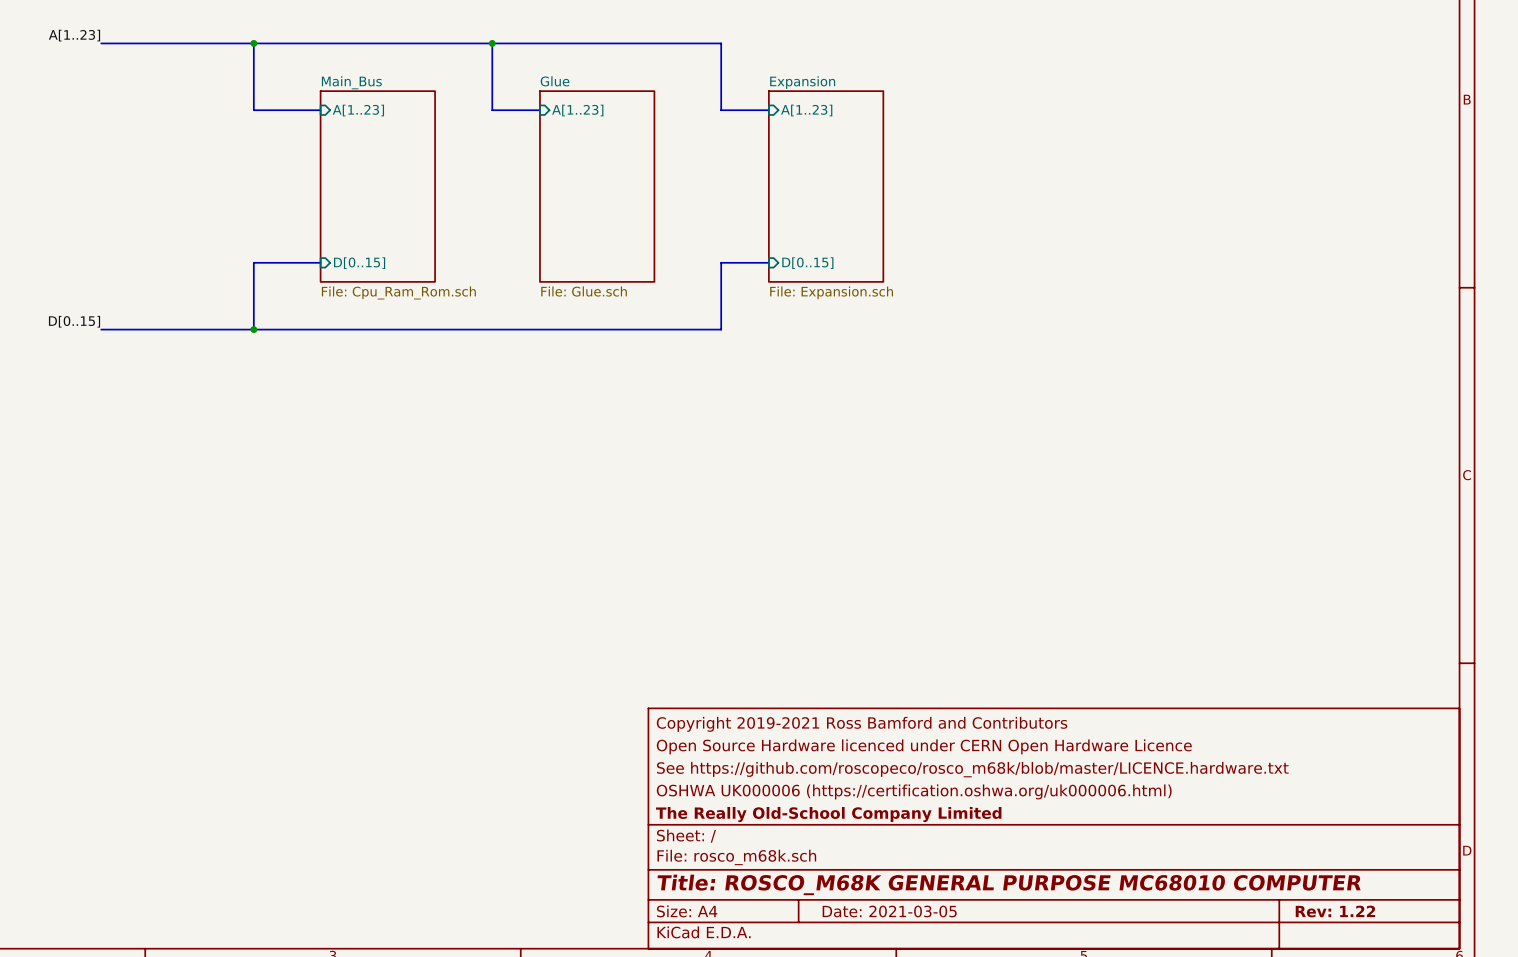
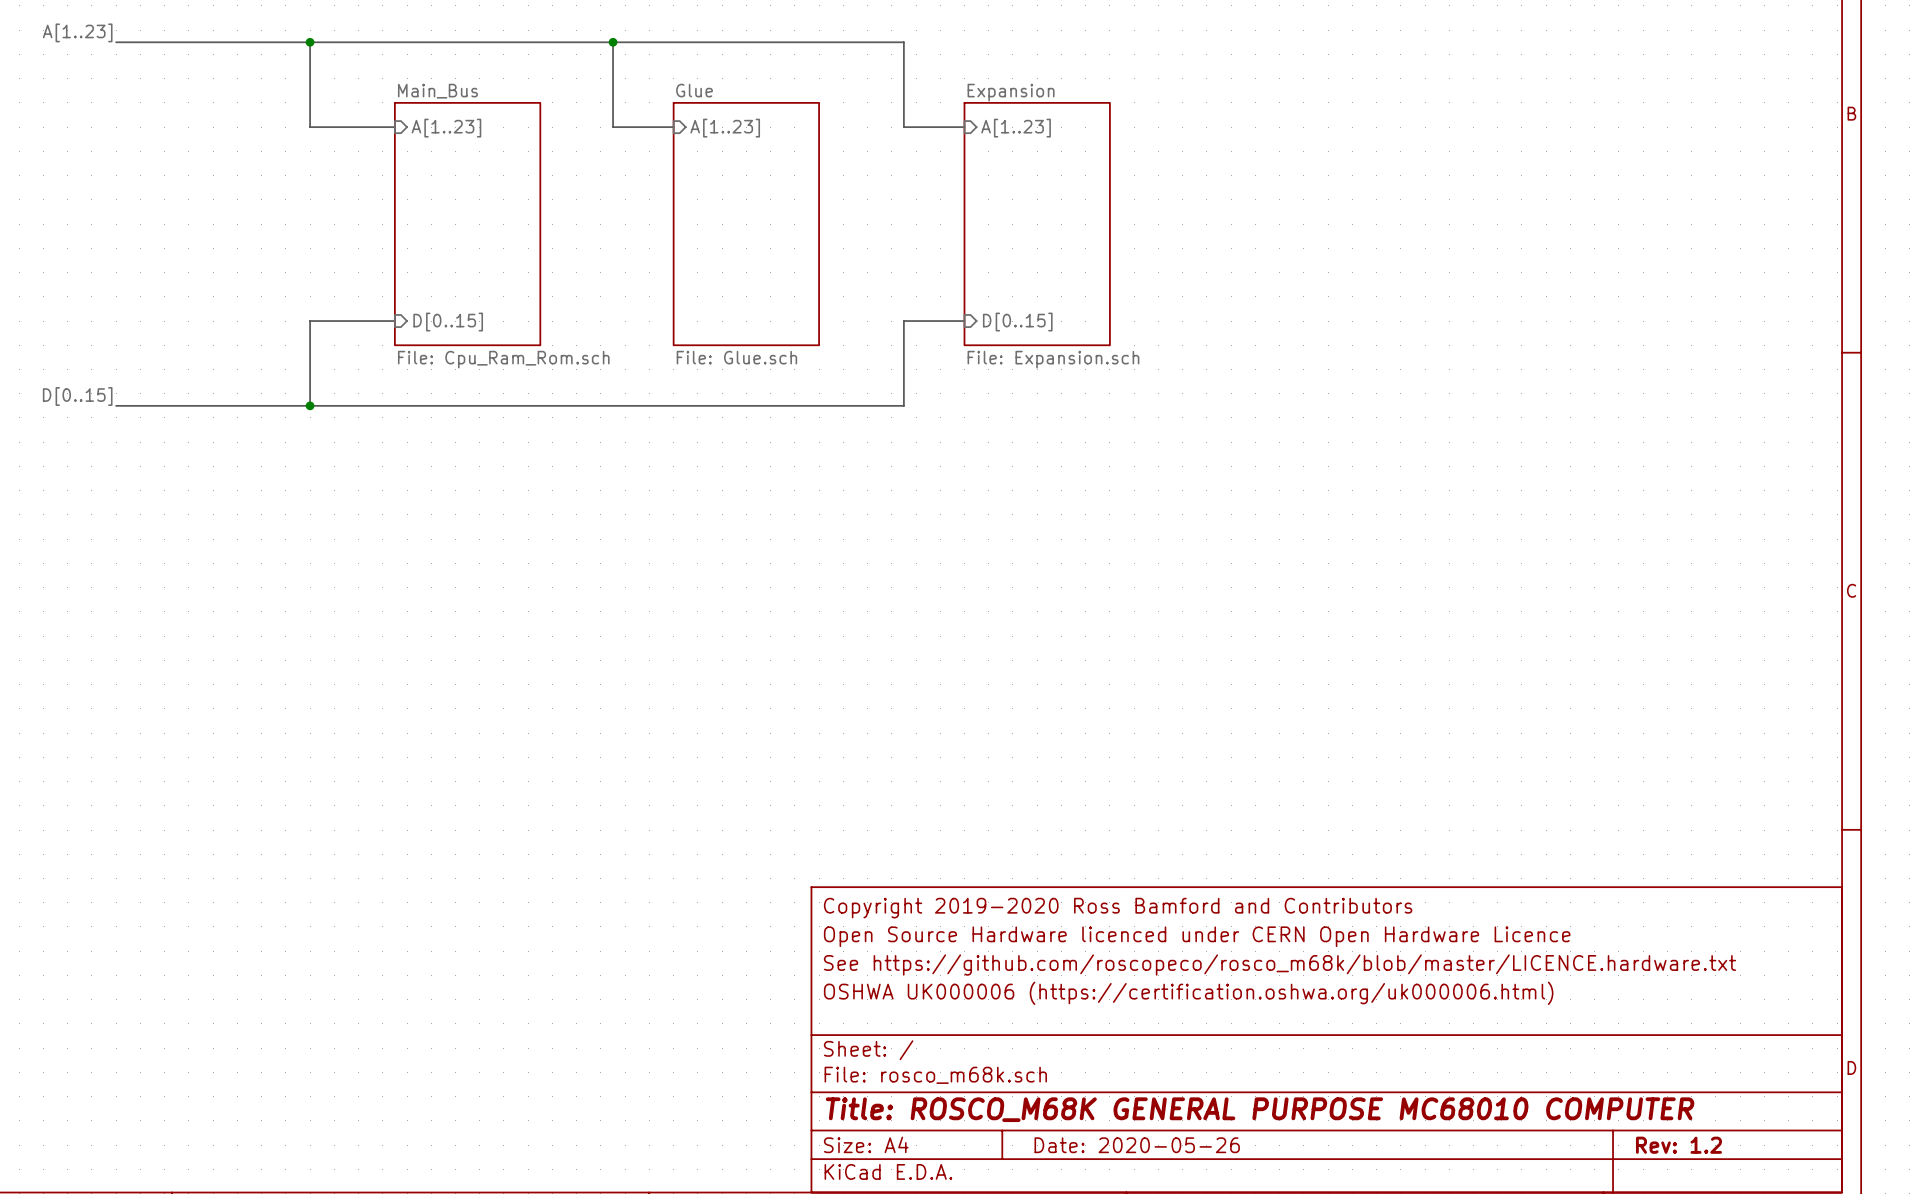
title block: Copyright 2019-2021 Ross Bamford and Contributors (862, 724) -> Copyright 2019-2020 Ross Bamford and Contributors (1118, 908)
title block: The Really Old-School Company Limited (828, 814) -> none
title block: Date: 2021-03-05 (889, 911) -> Date: 2020-05-26 (1137, 1145)
title block: Rev: 1.22 (1335, 911) -> Rev: 1.2 (1678, 1145)

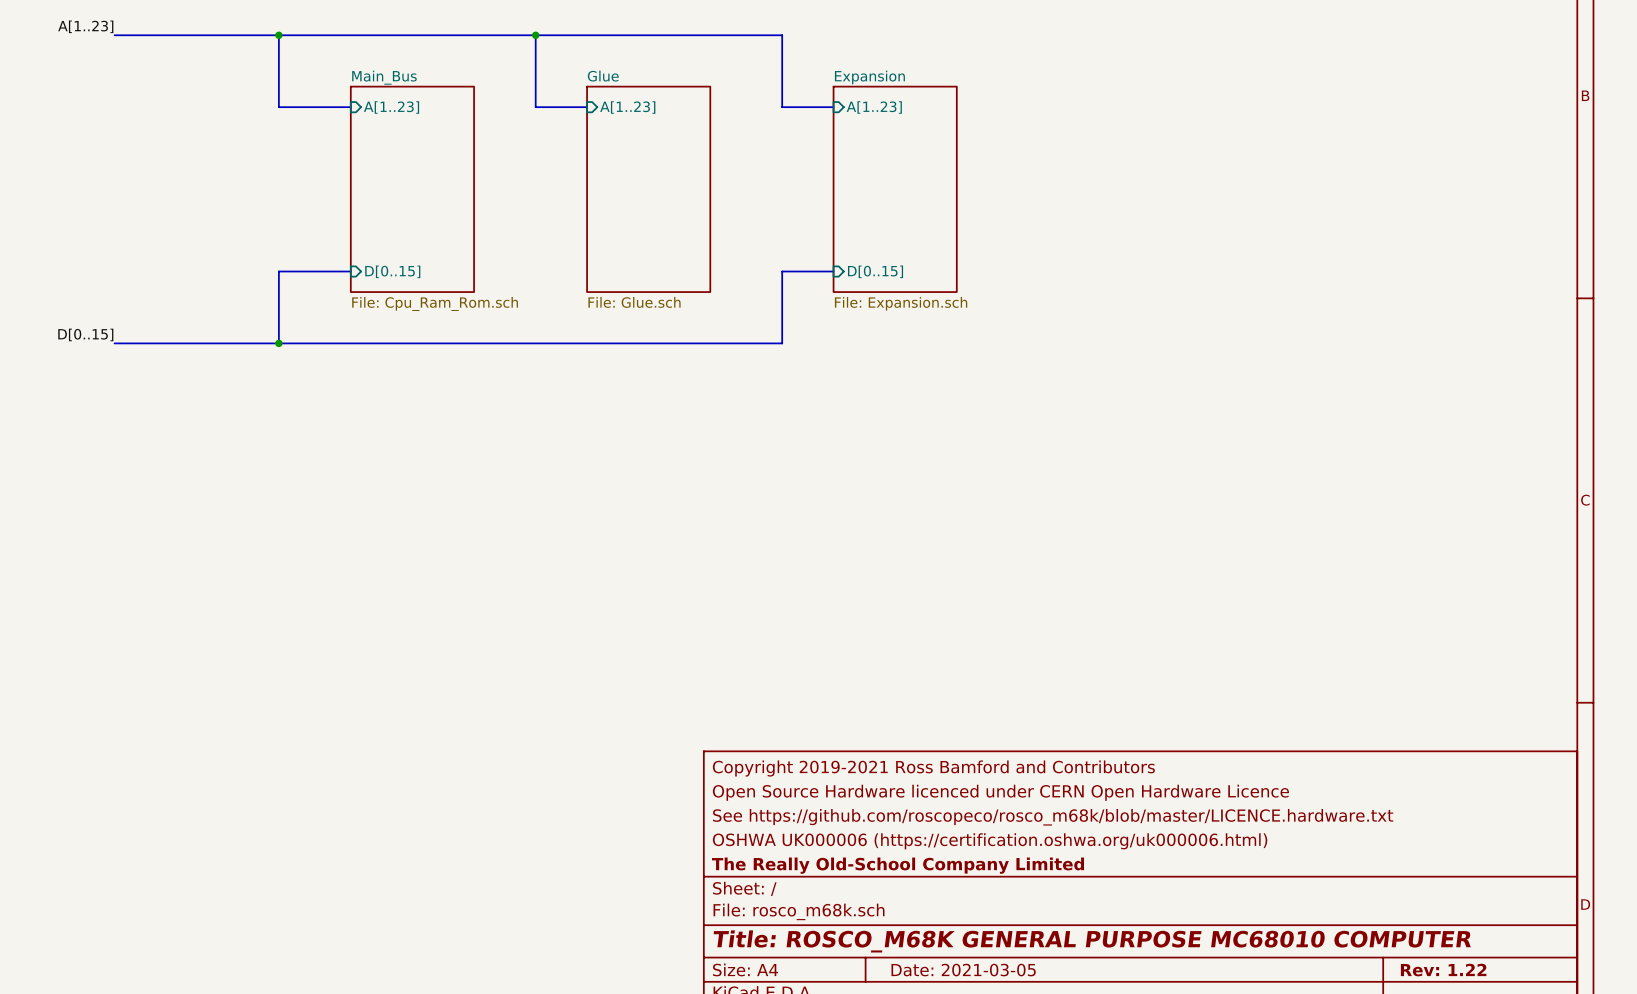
title block: Copyright 2019-2020 Ross Bamford and Contributors (1118, 908) -> Copyright 2019-2021 Ross Bamford and Contributors (933, 768)
title block: none -> The Really Old-School Company Limited (898, 865)
title block: Date: 2020-05-26 (1137, 1145) -> Date: 2021-03-05 (963, 970)
title block: Rev: 1.2 (1678, 1145) -> Rev: 1.22 (1443, 970)

